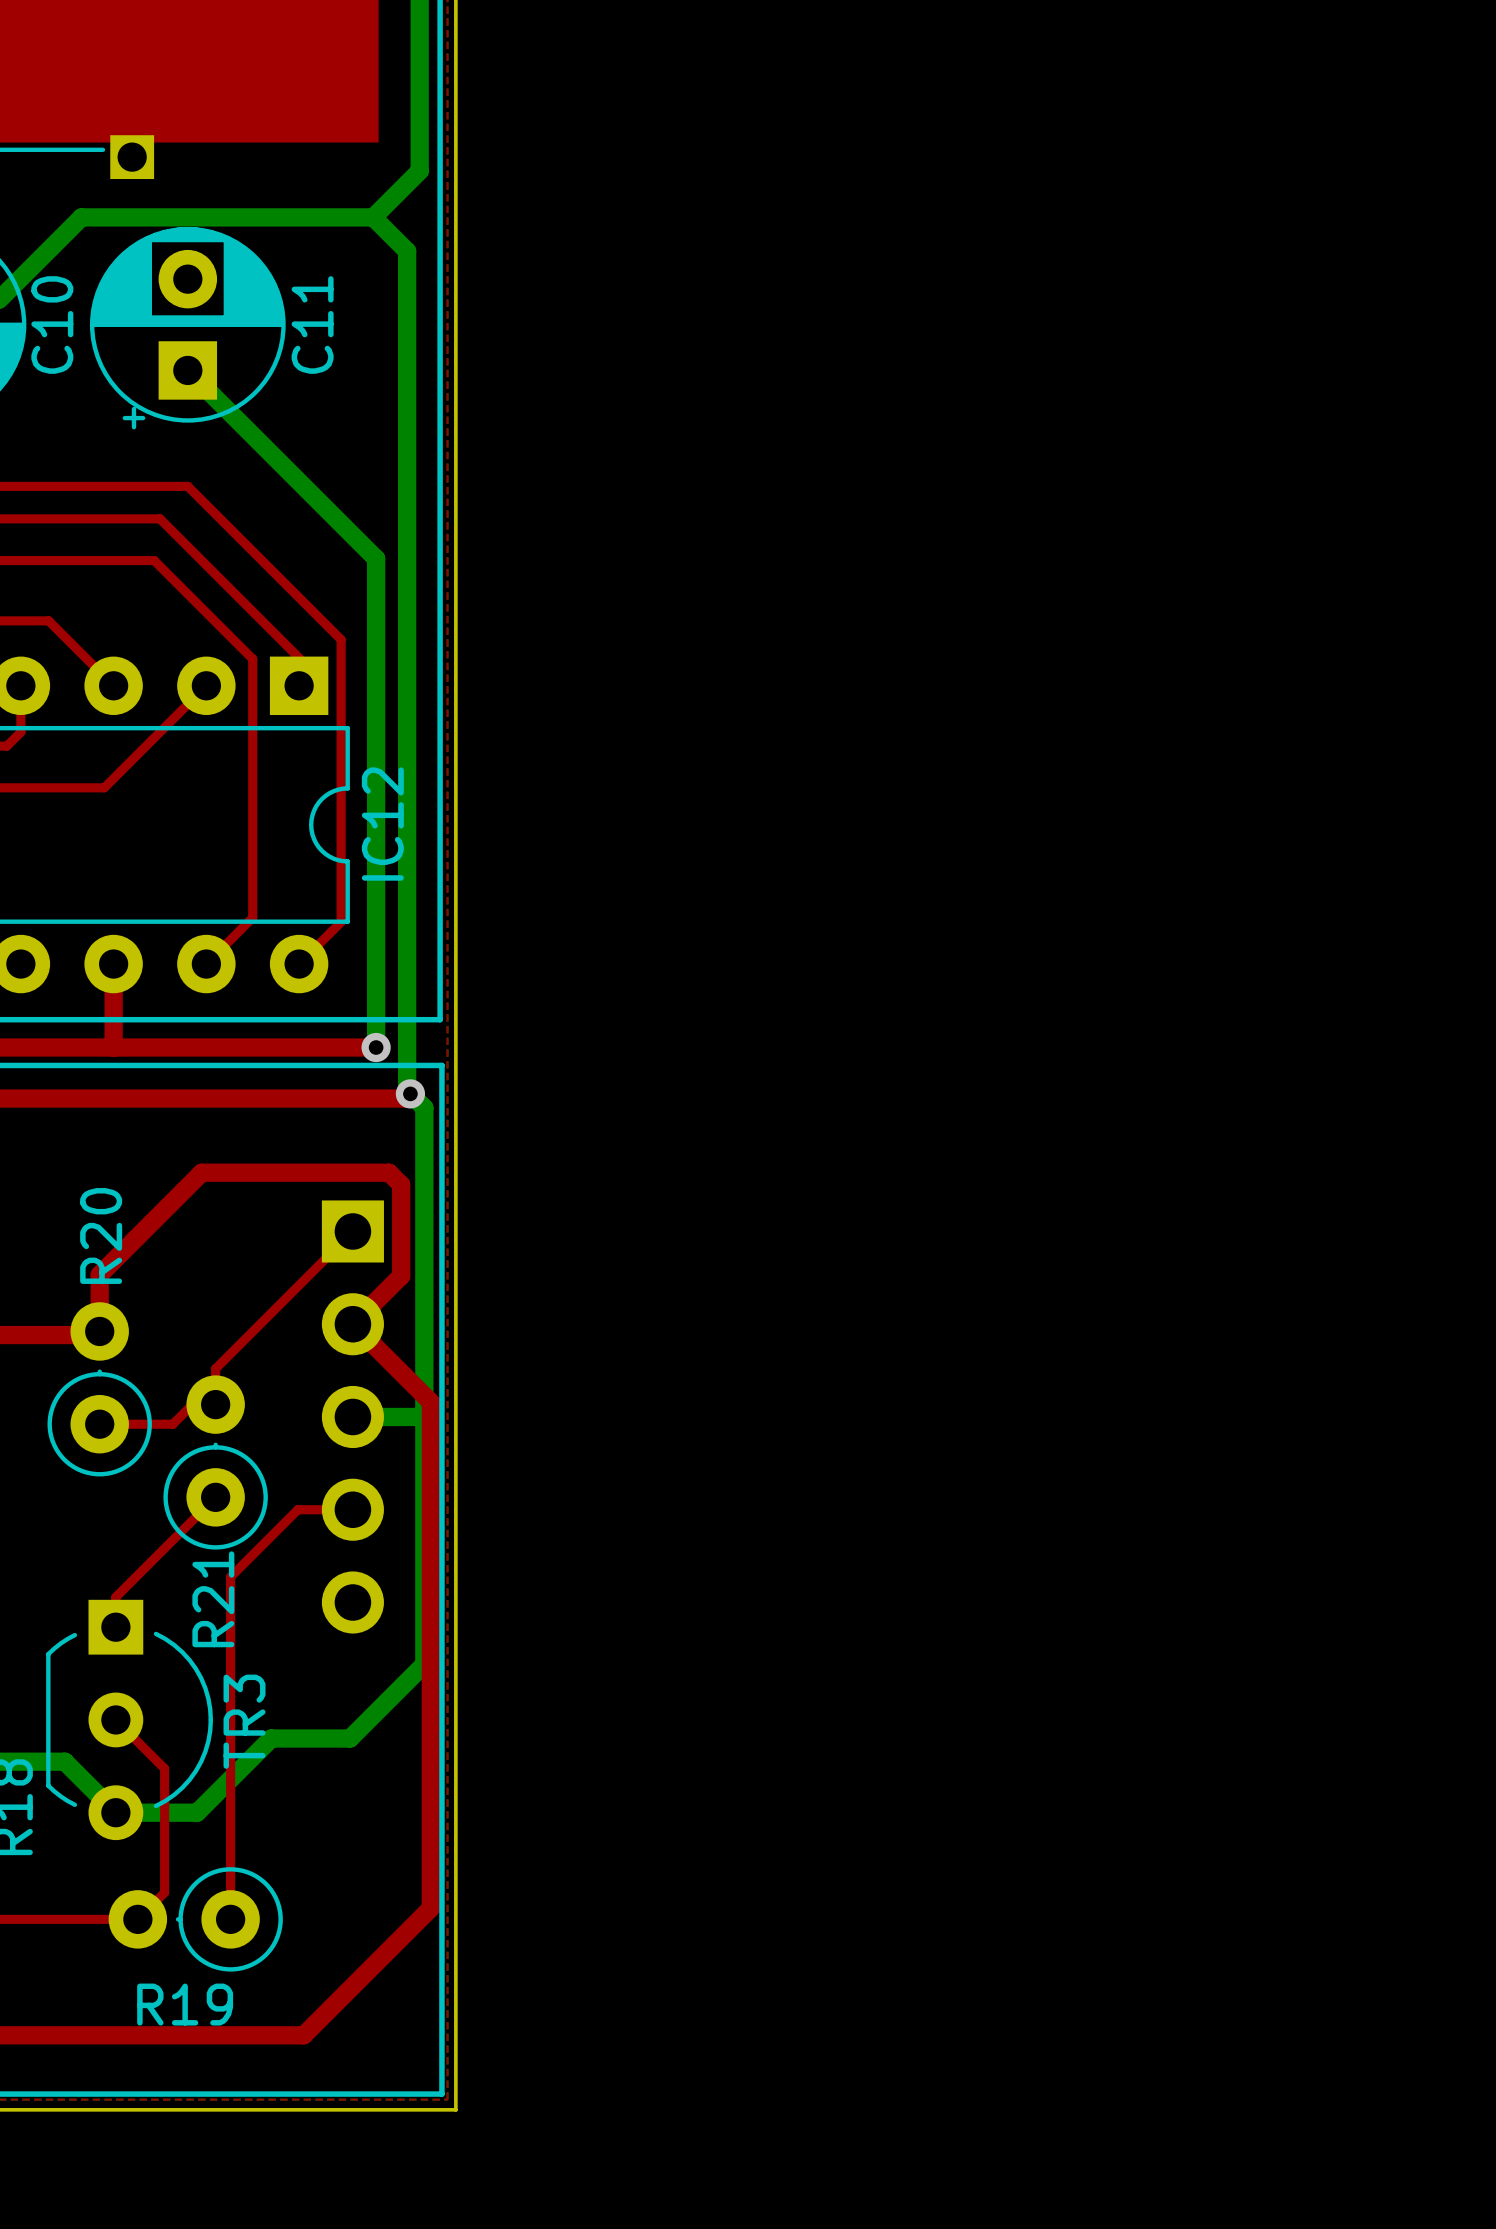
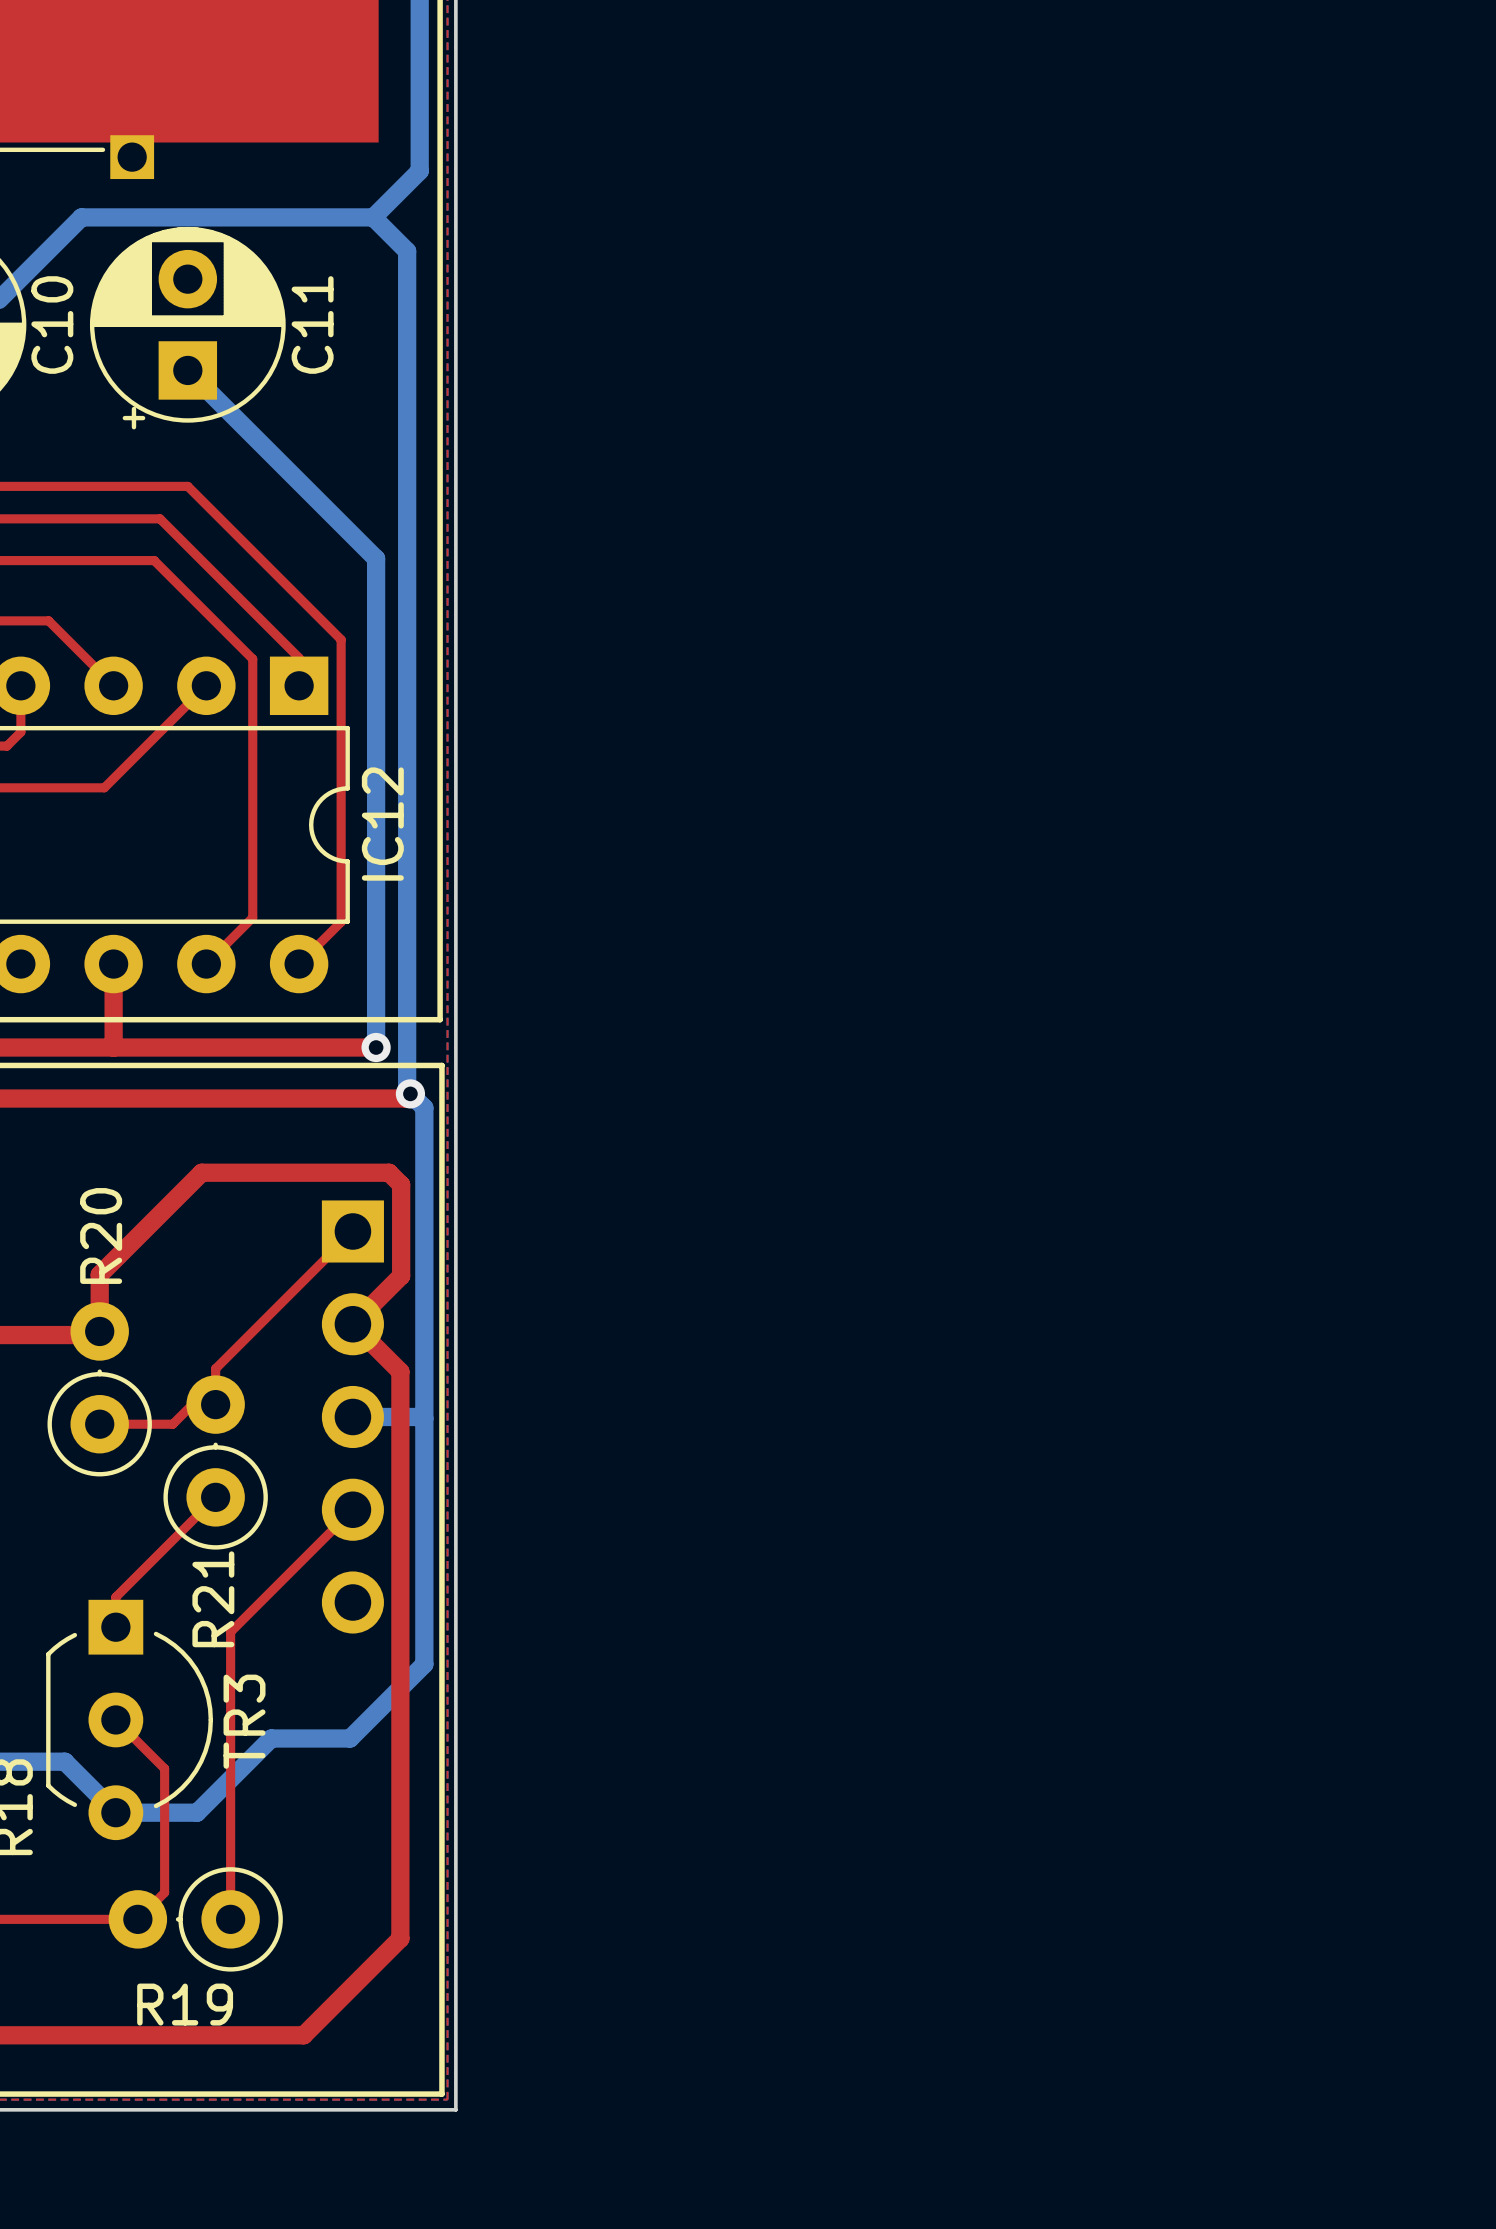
top track: (400, 1371) (430, 1402) (430, 1908) (400, 1938) -> (400, 1371) (400, 1938)
top track: (352, 1509) (297, 1509) (230, 1576) (230, 1632) -> (352, 1509) (230, 1632)

